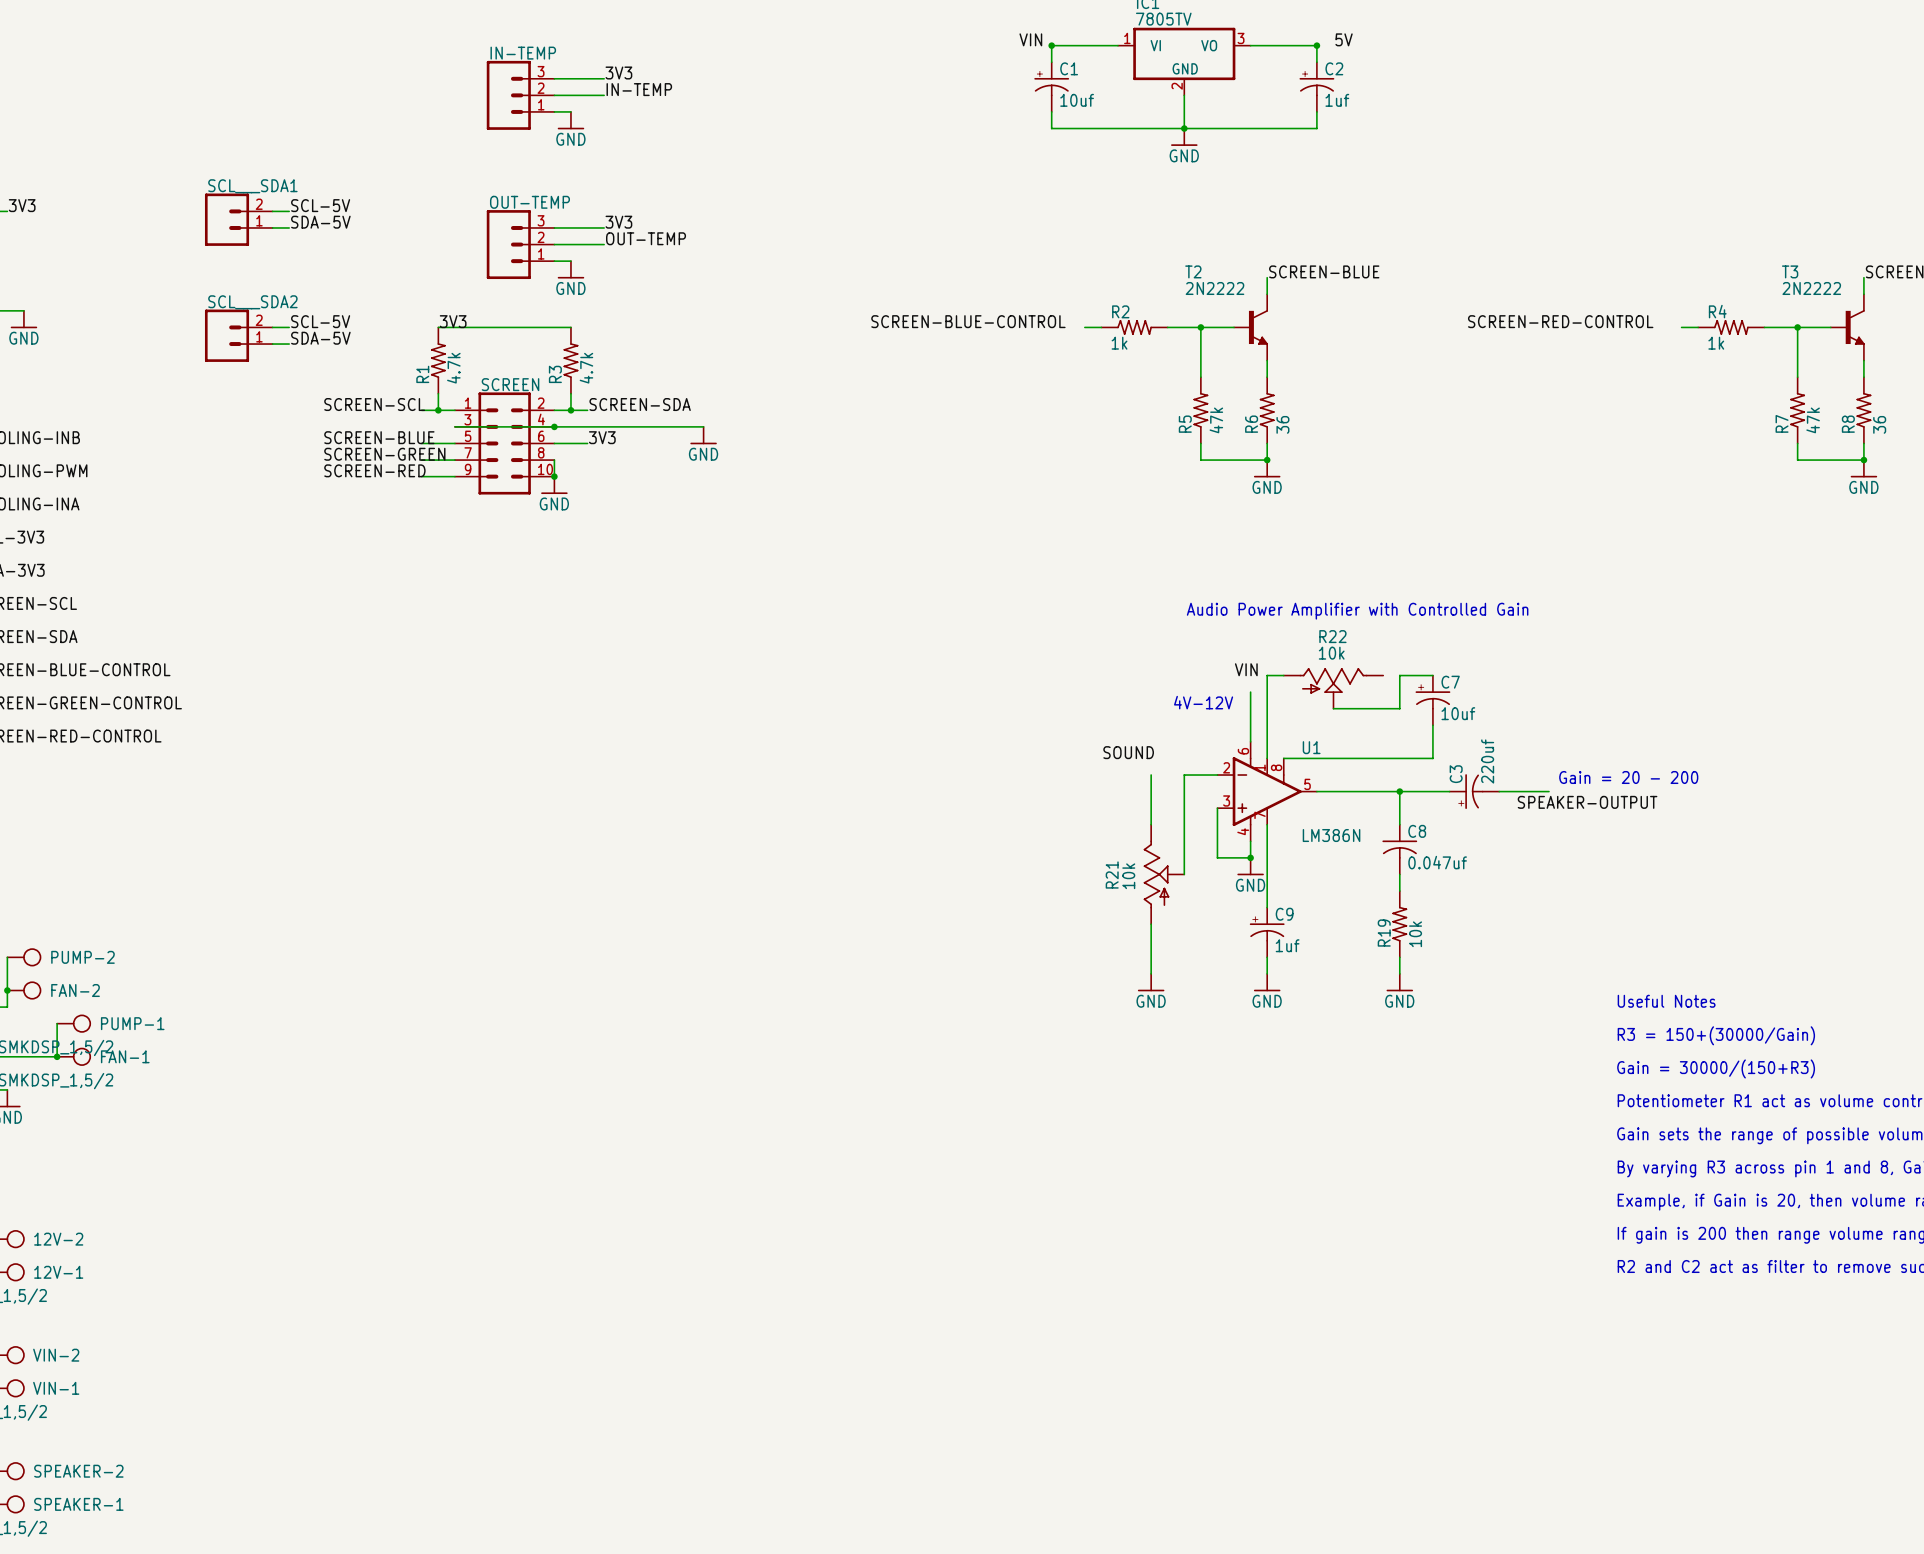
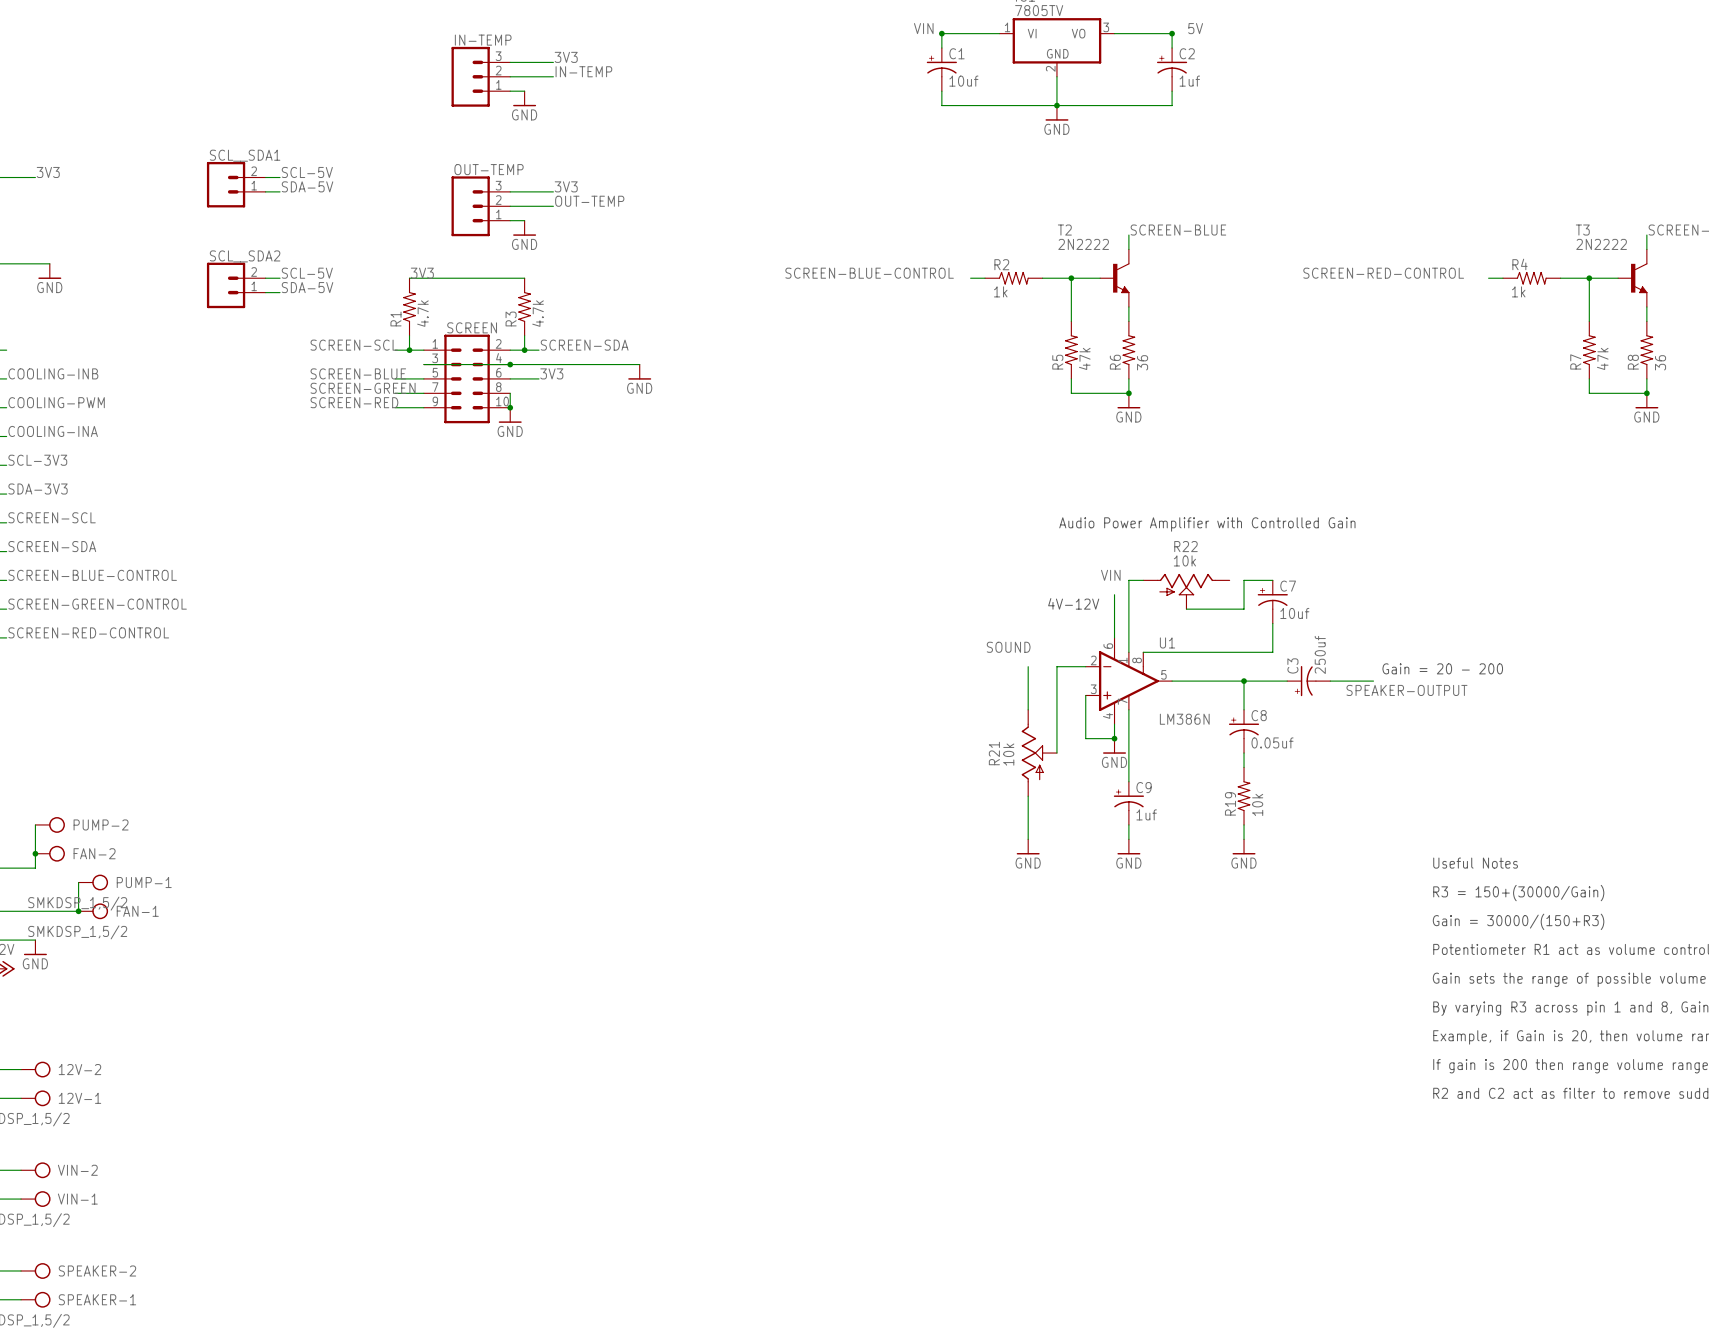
SCL___SDA1 name: SCL___SDA1 (252, 186) -> SCL__SDA1 (245, 155)
SCL___SDA2 name: SCL___SDA2 (252, 302) -> SCL__SDA2 (245, 256)
C3 value: 220uf (1487, 761) -> 250uf (1320, 654)
C8 symbol: [1382, 824, 1418, 875] -> [1228, 709, 1260, 754]
C8 value: 0.047uf (1437, 862) -> 0.05uf (1272, 742)

